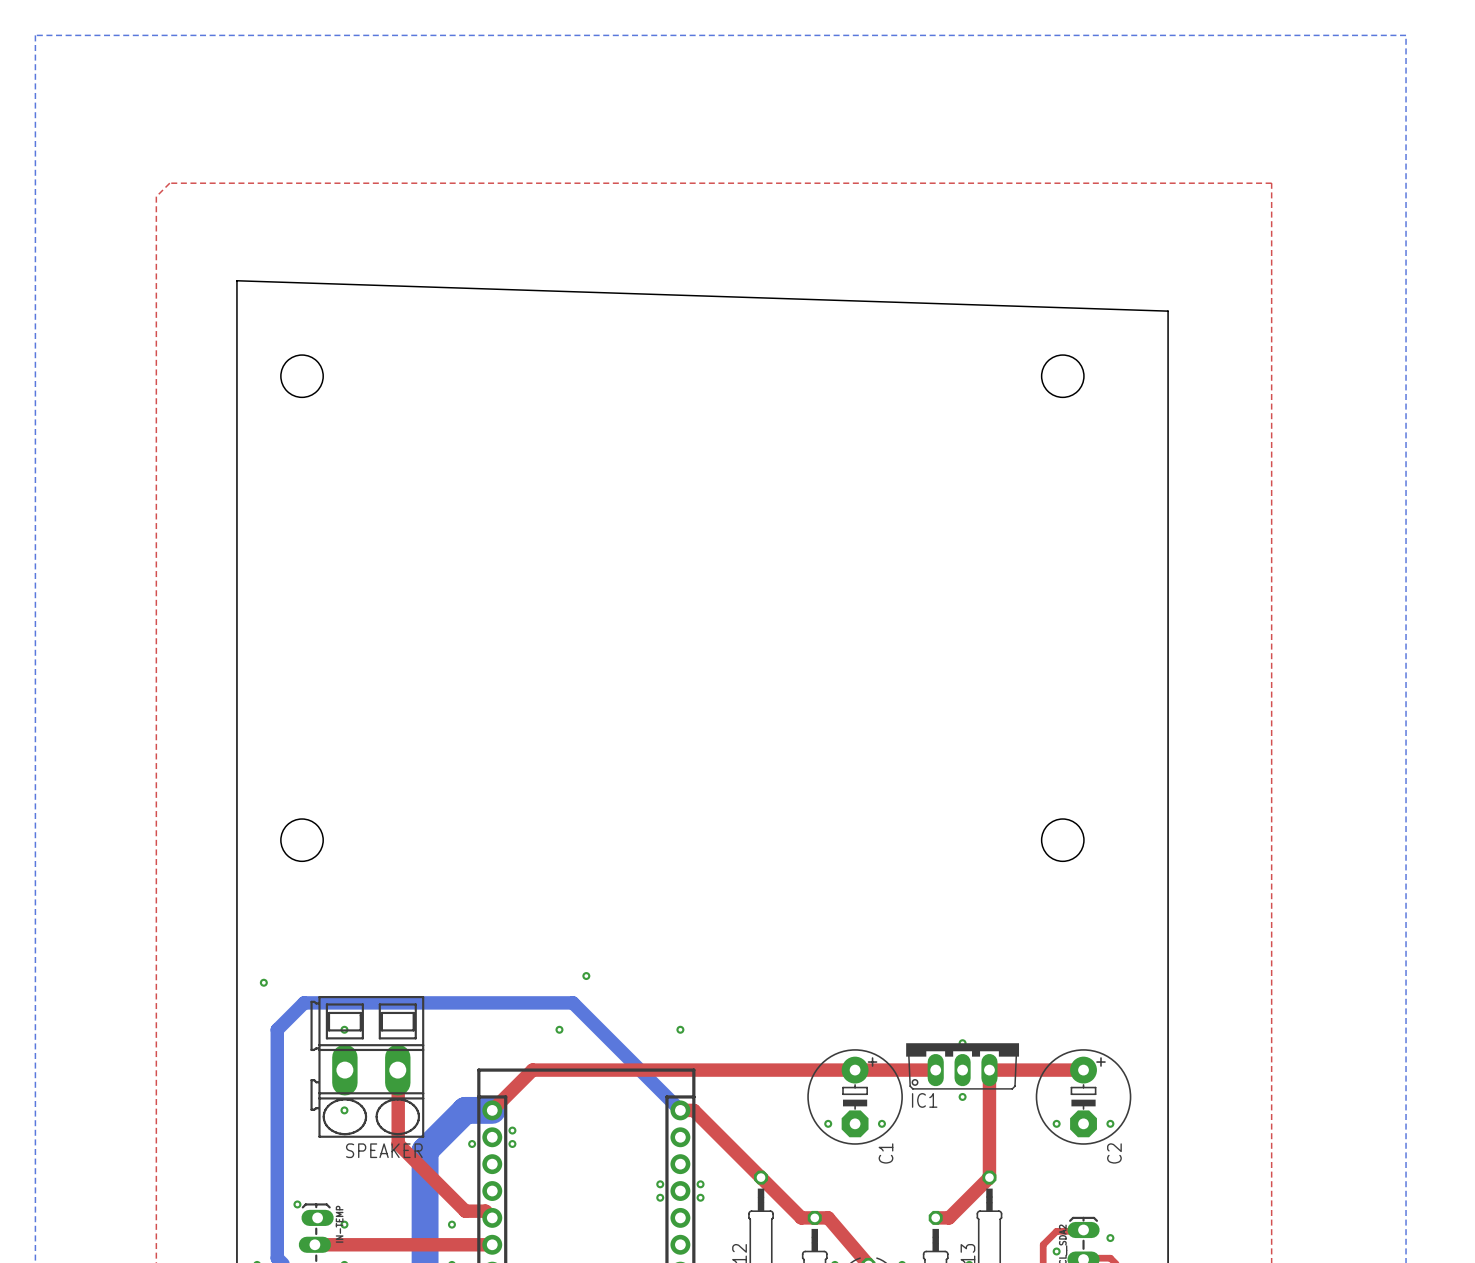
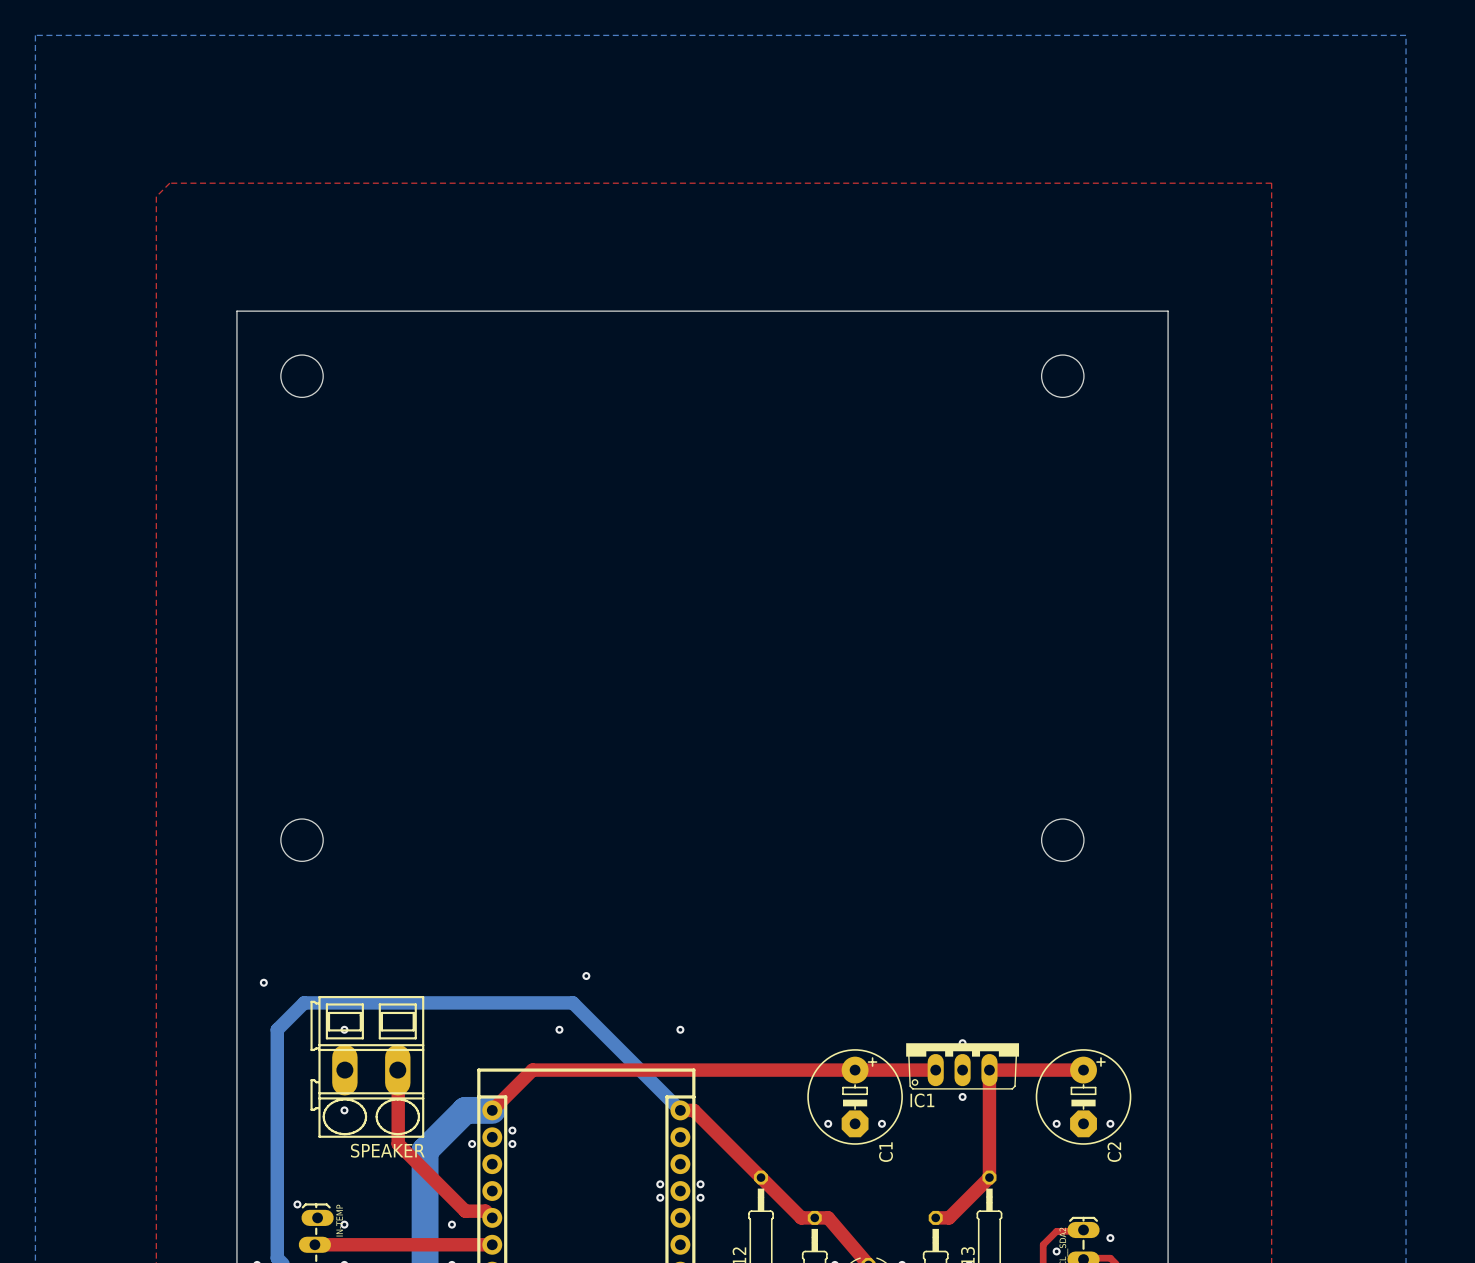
board edge: (236, 311) (236, 280) (1168, 311) -> (236, 311) (1168, 311)

